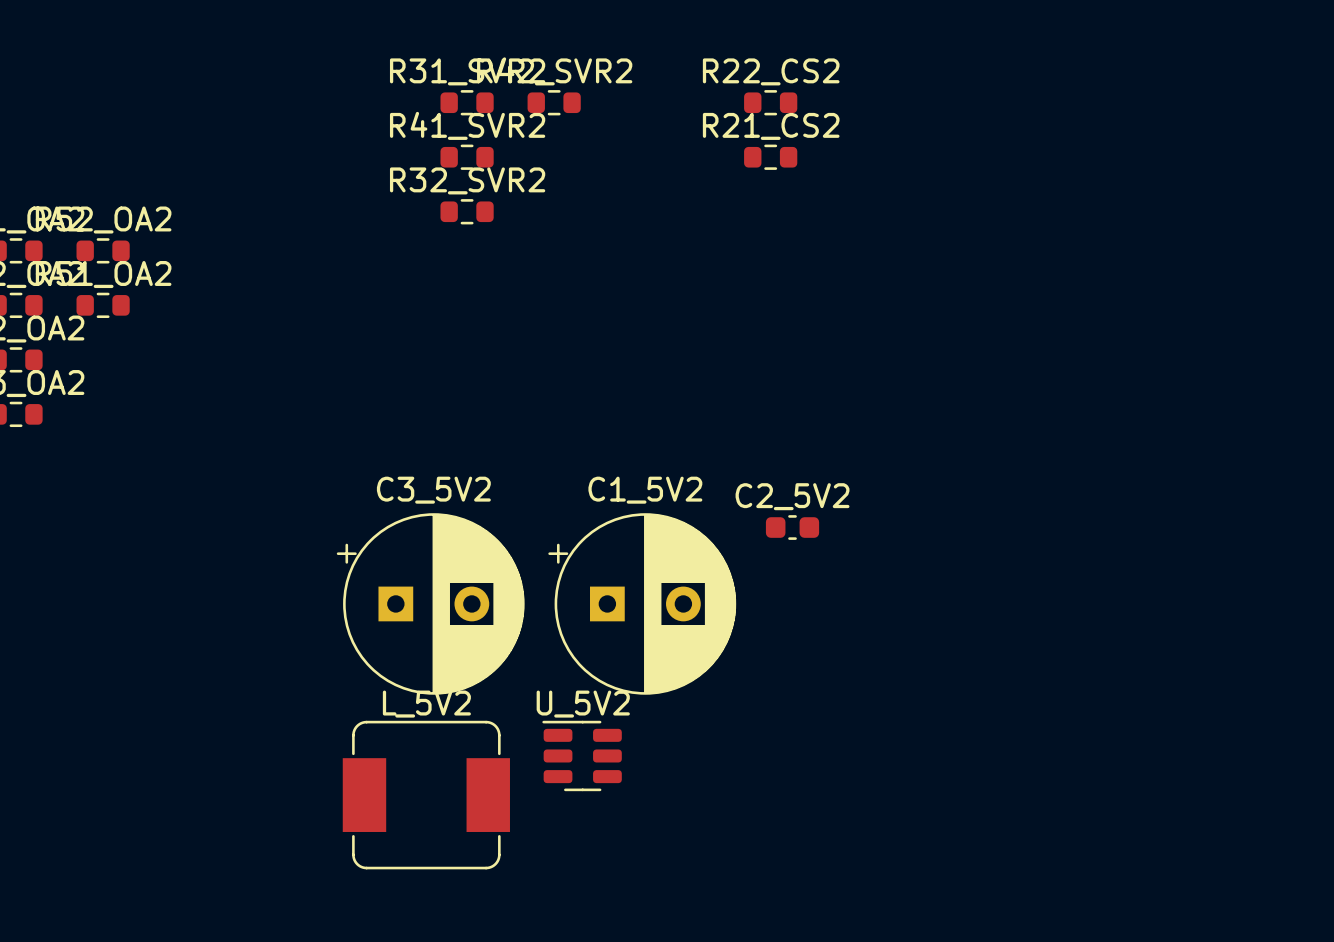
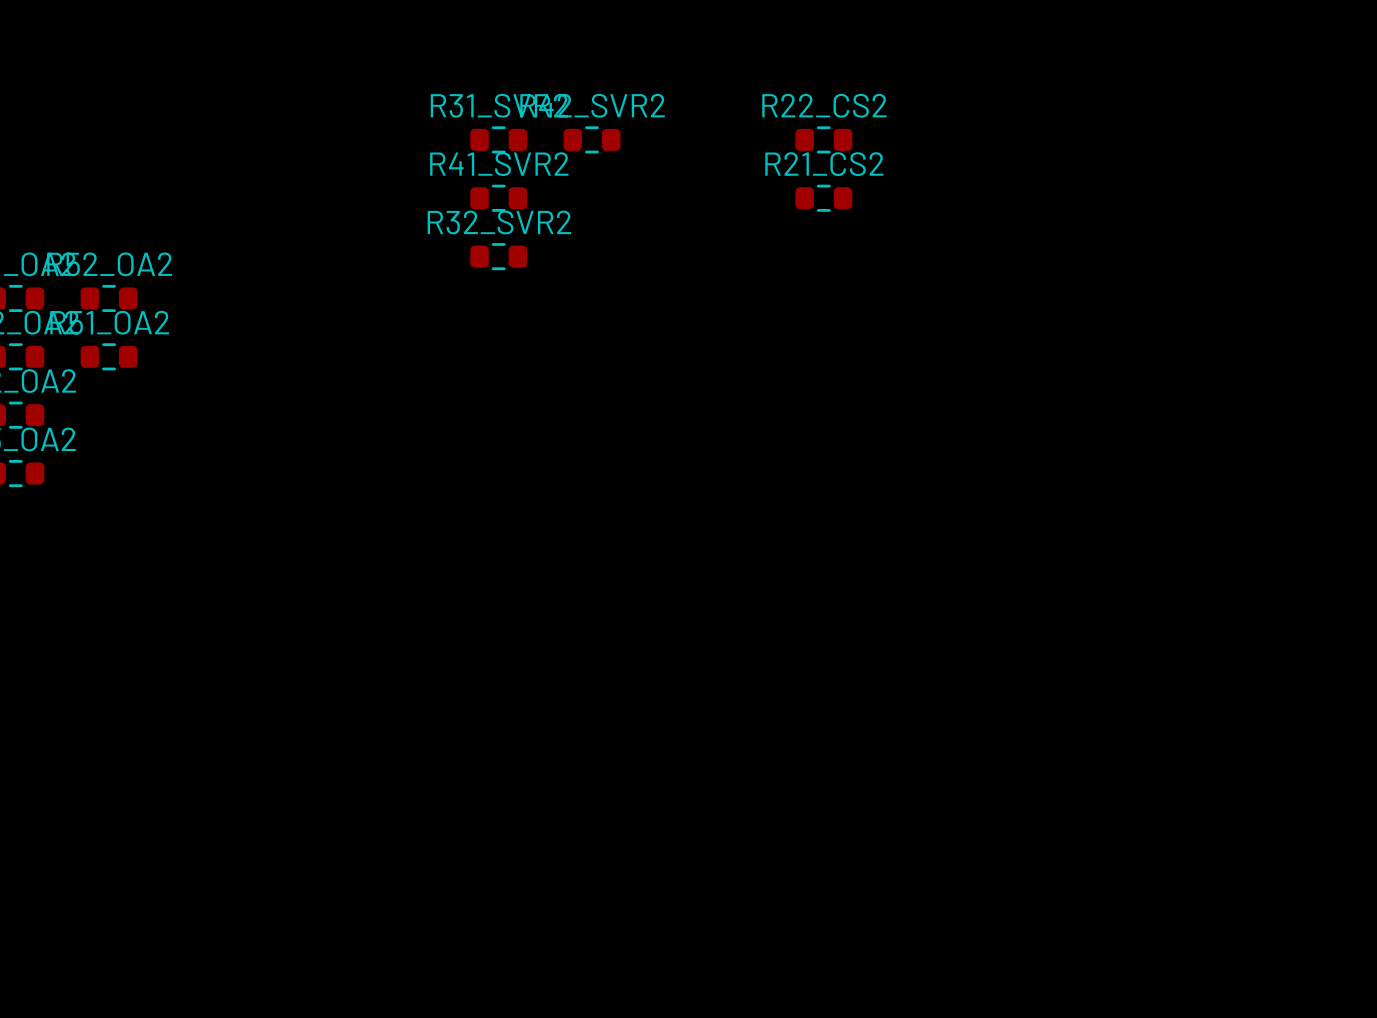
C2_5V2: (792, 527) -> none
C3_5V2: (430, 603) -> none
C1_5V2: (642, 603) -> none
U_5V2: (582, 755) -> none
L_5V2: (426, 795) -> none

